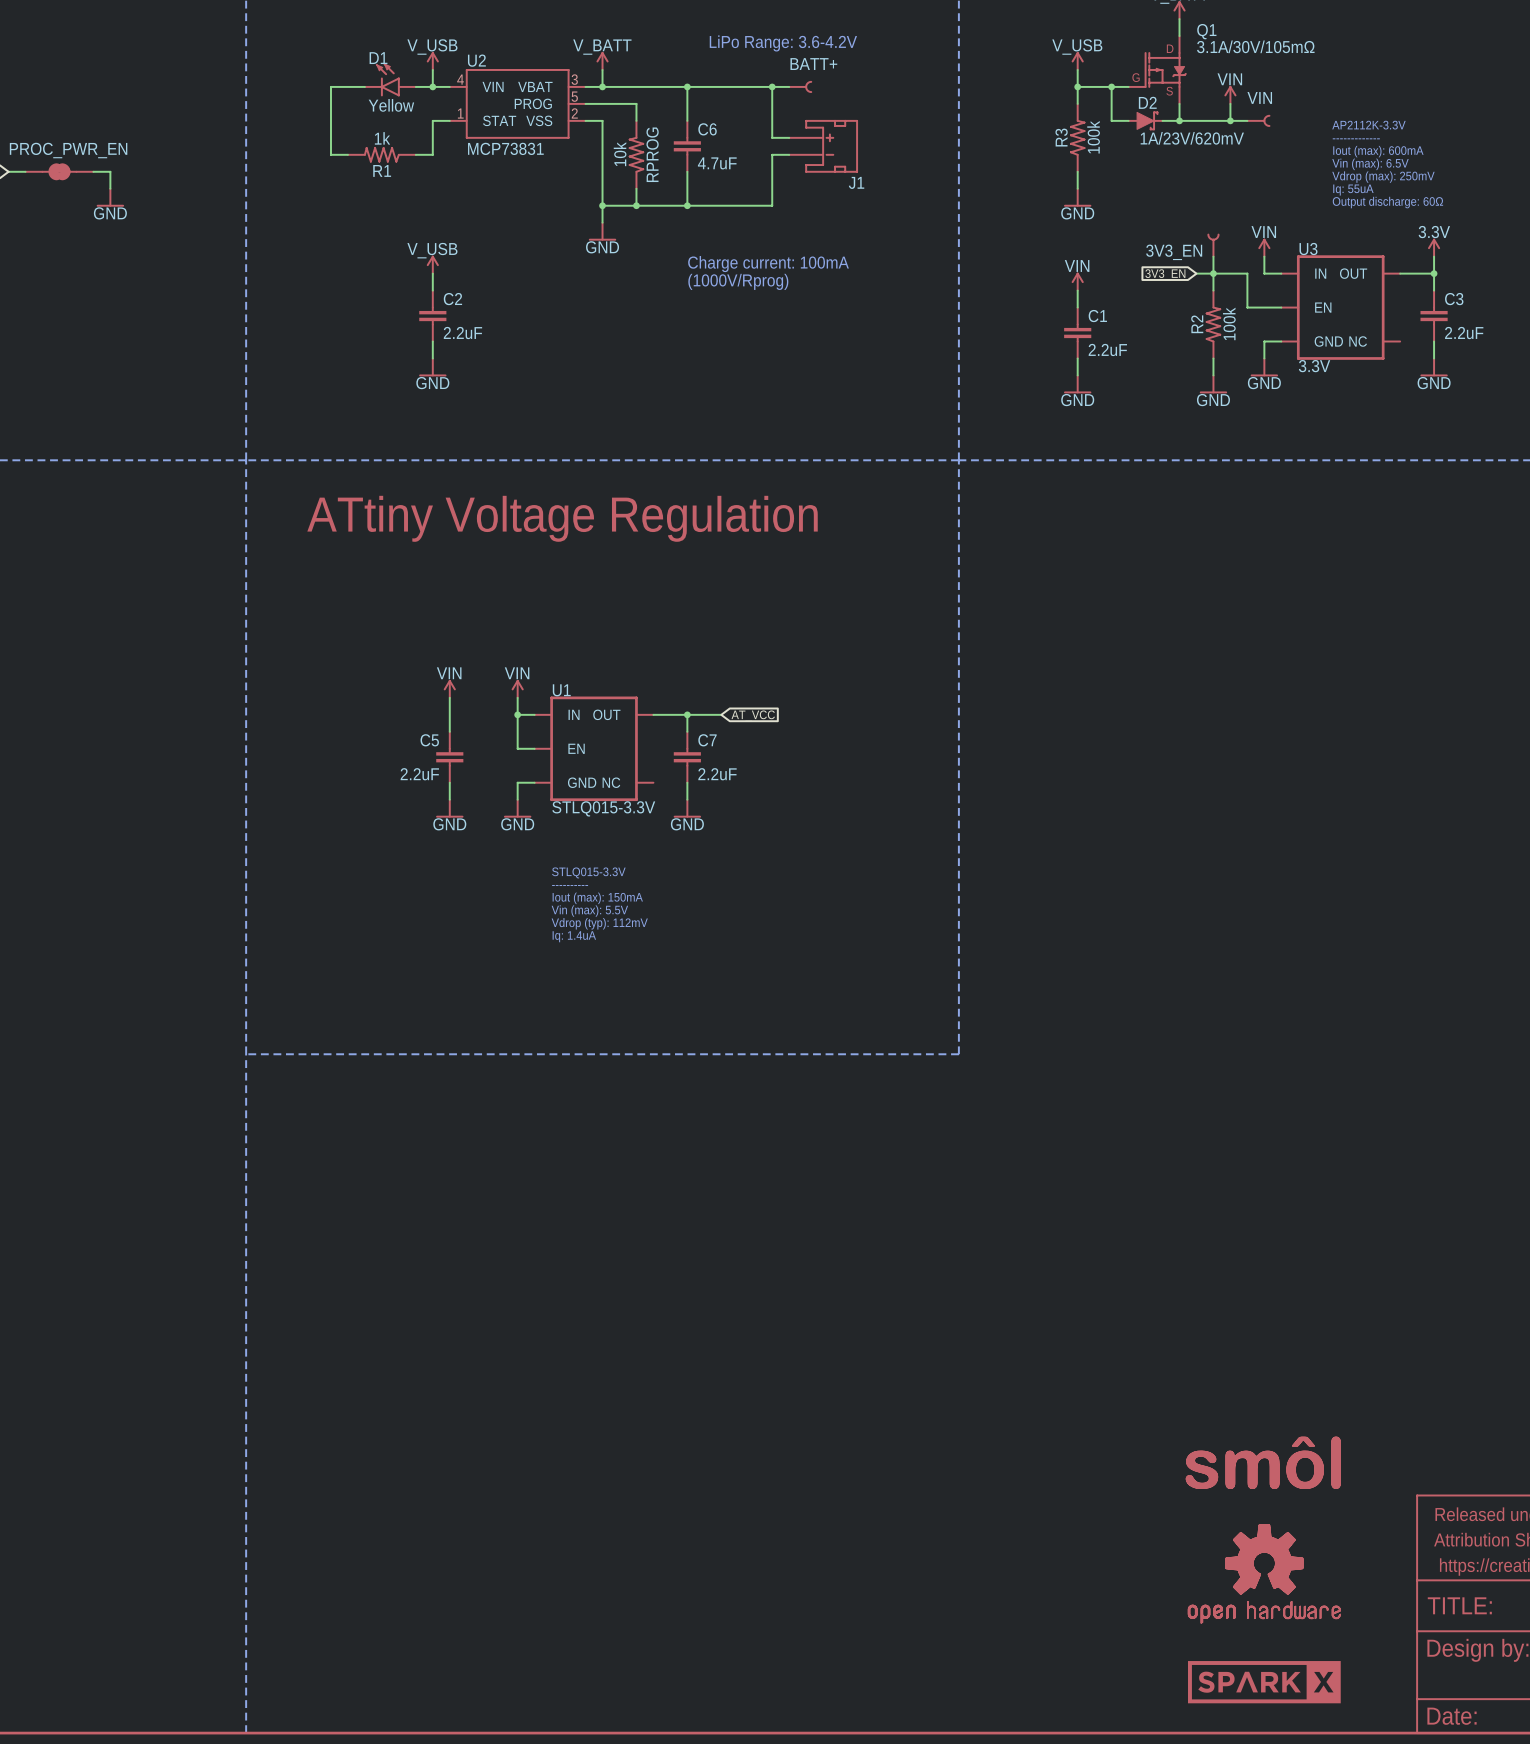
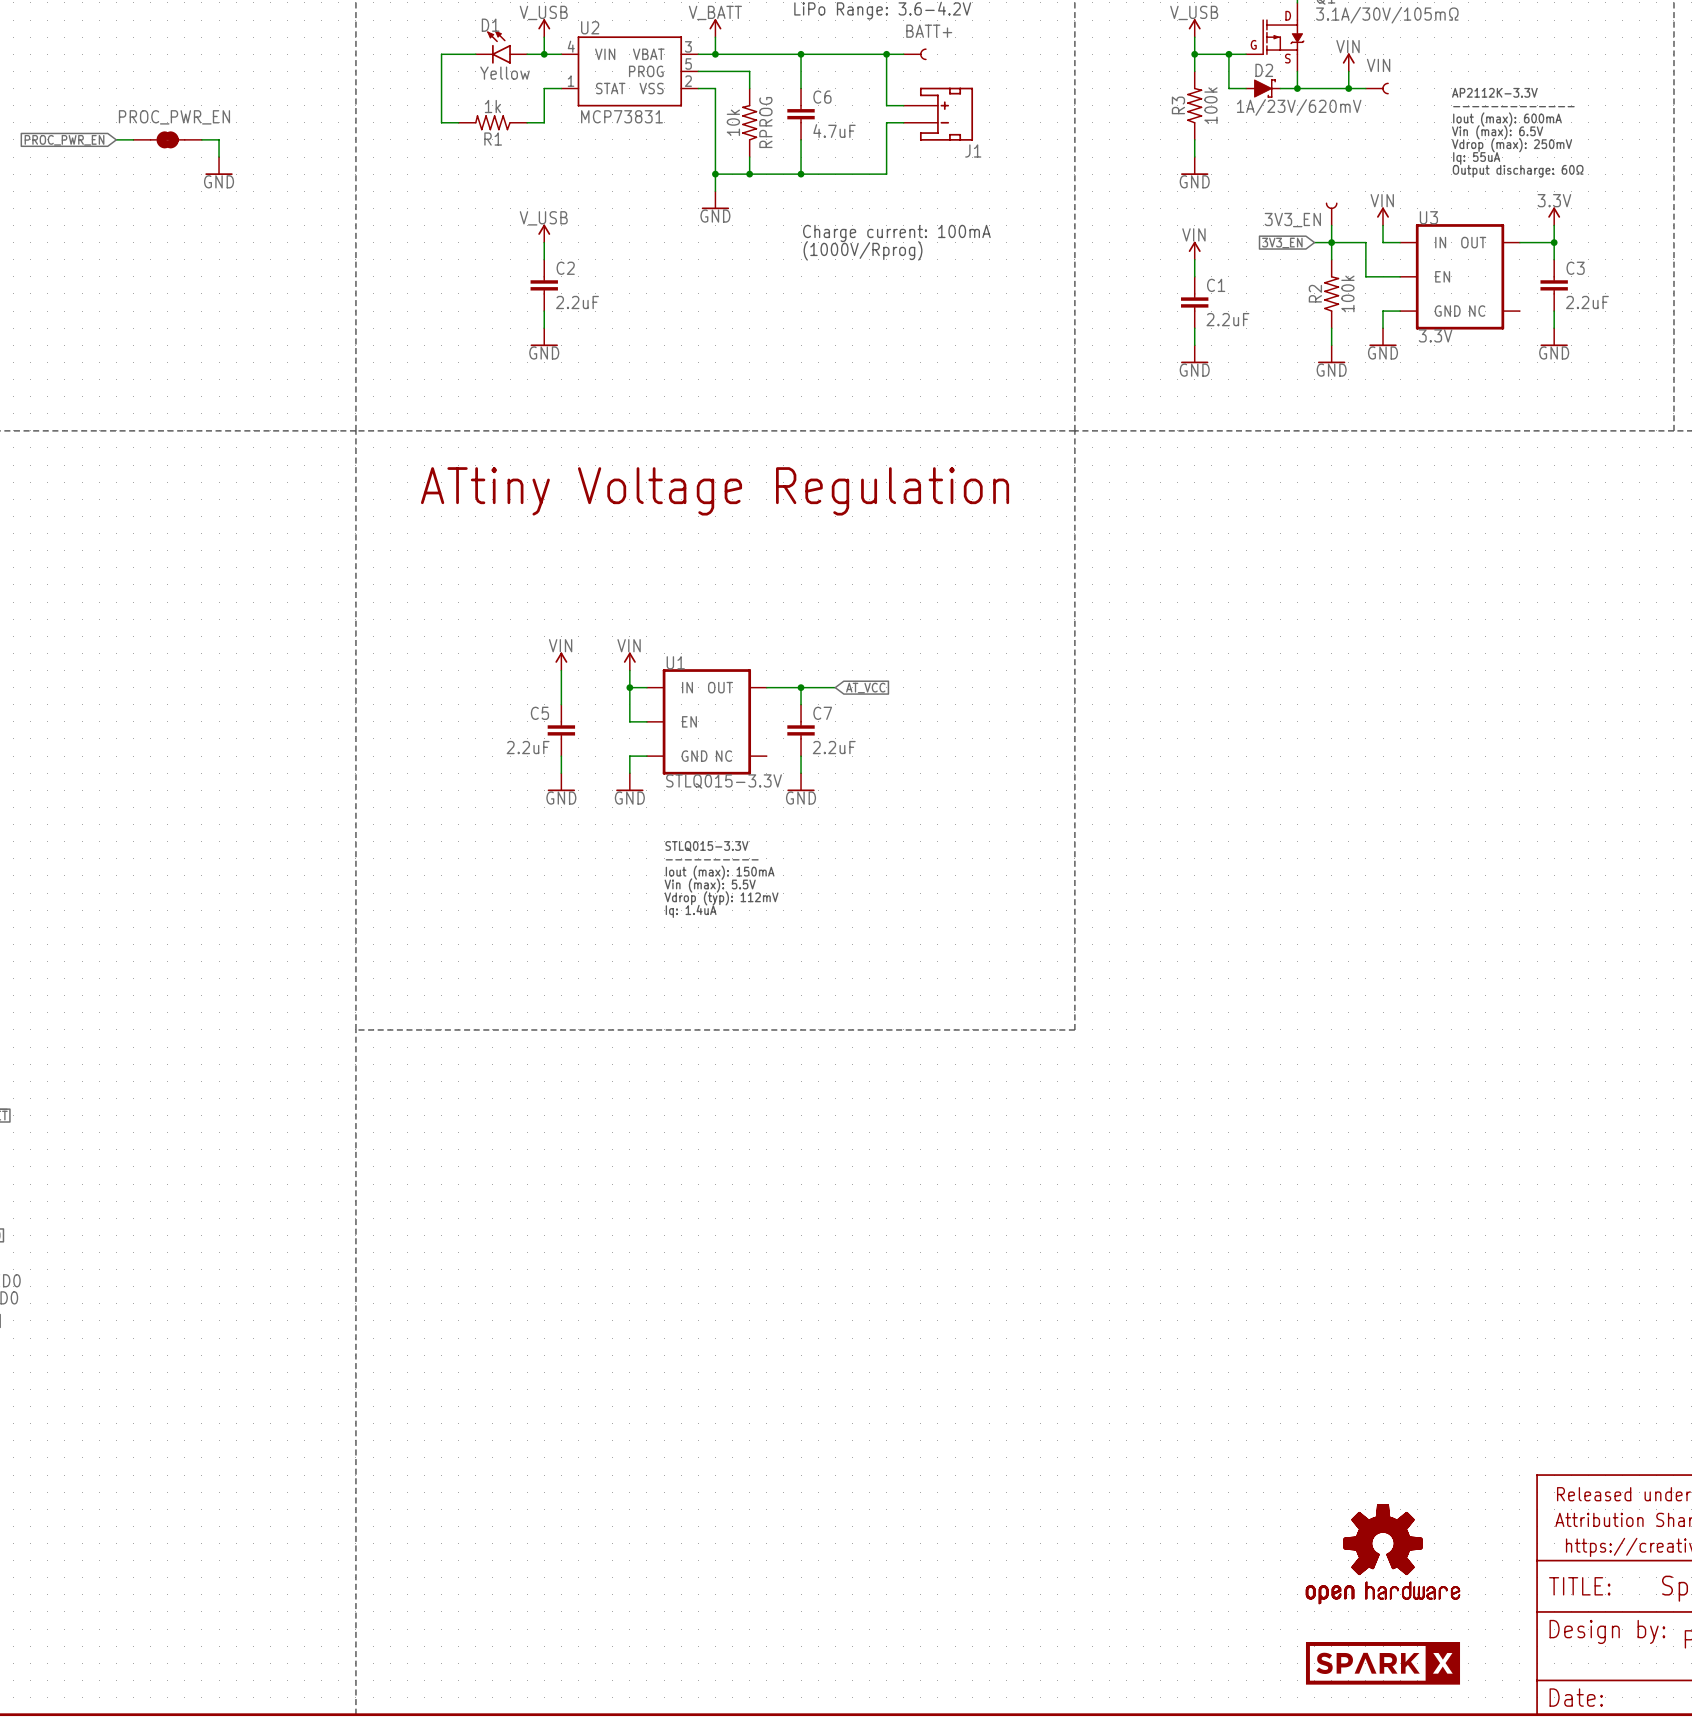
part: (1263, 1462) -> none

